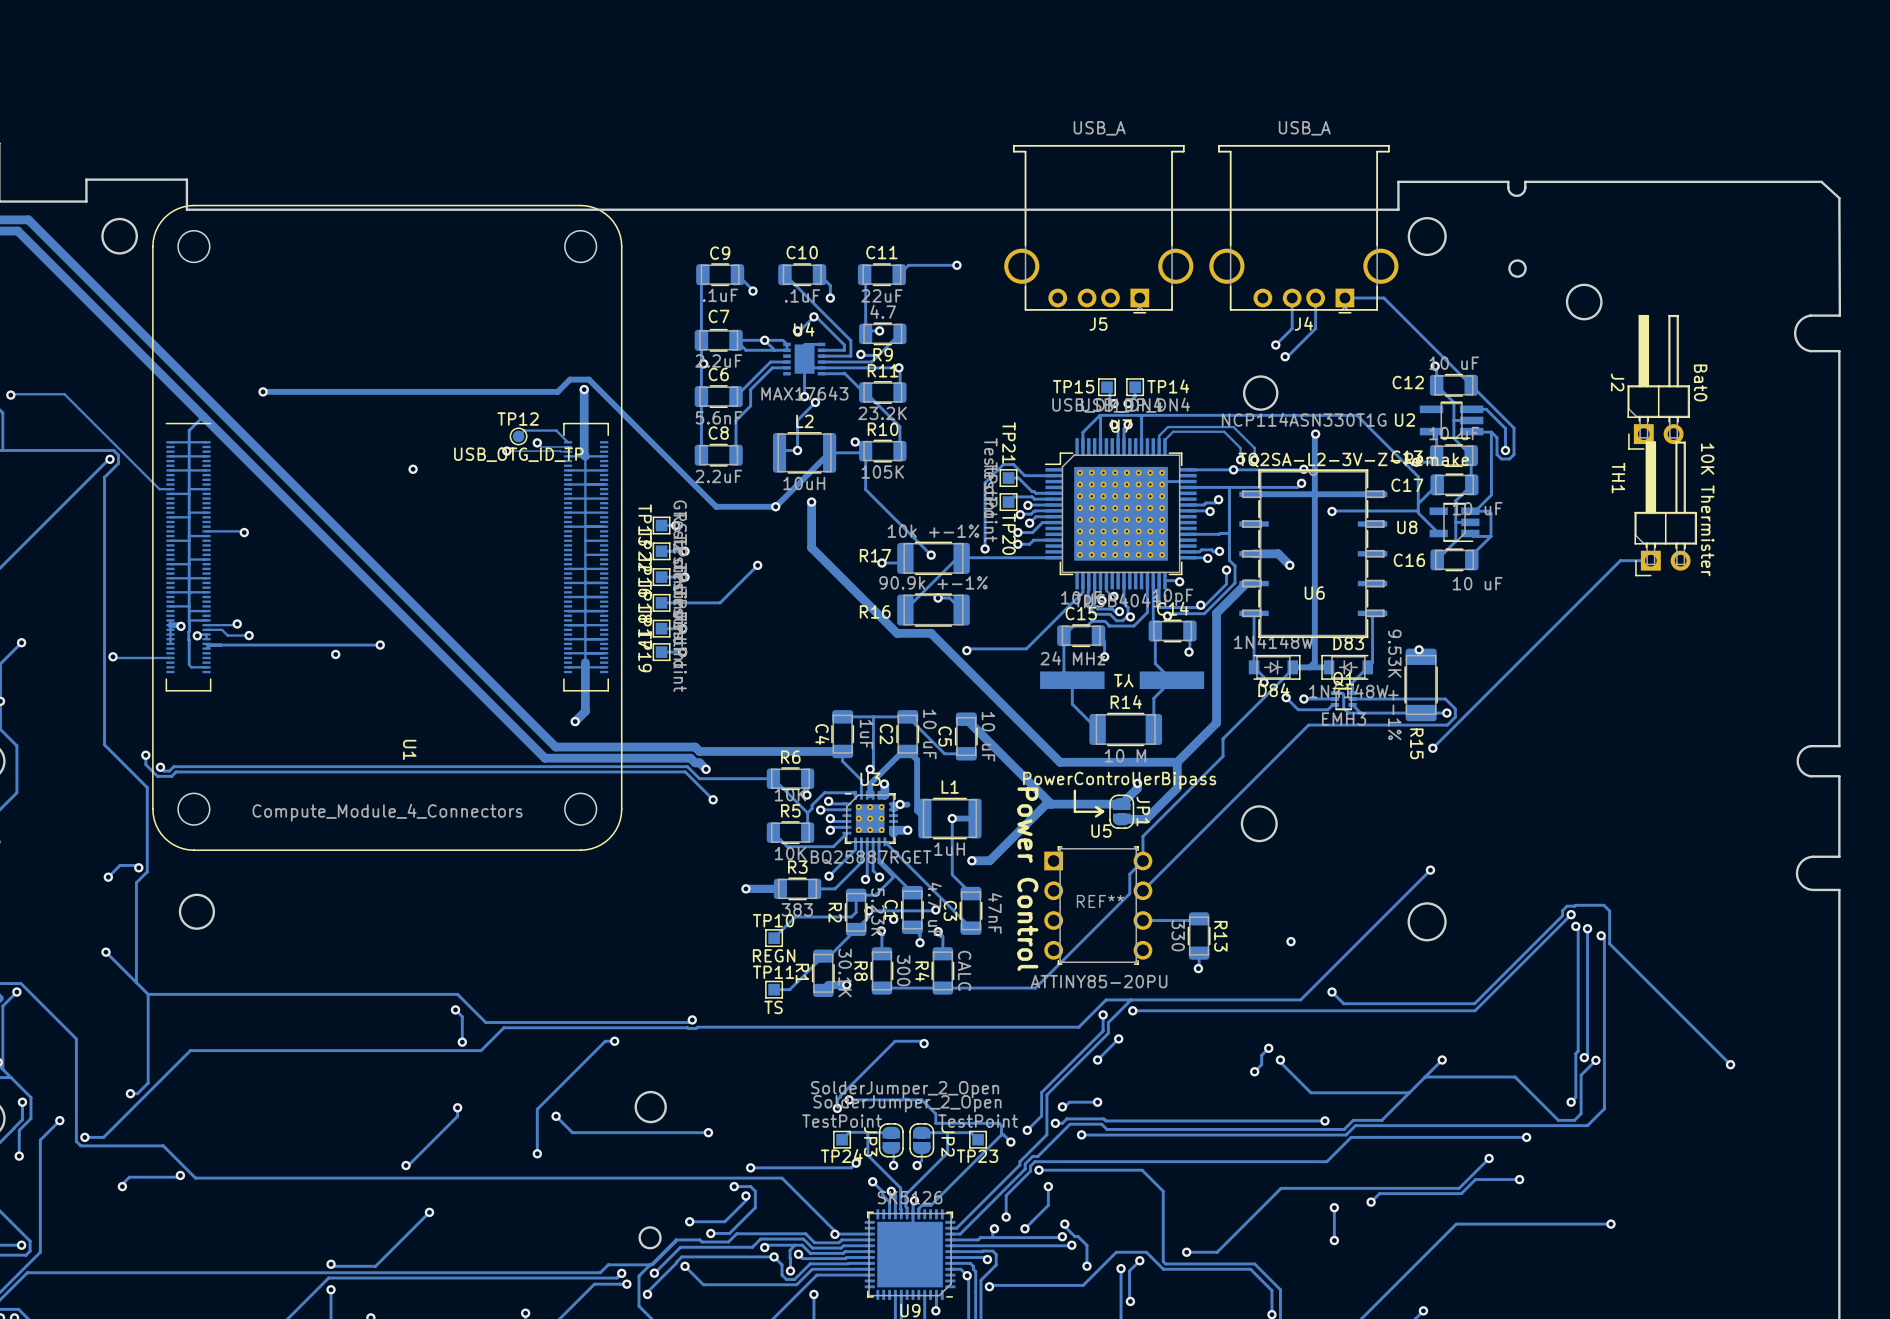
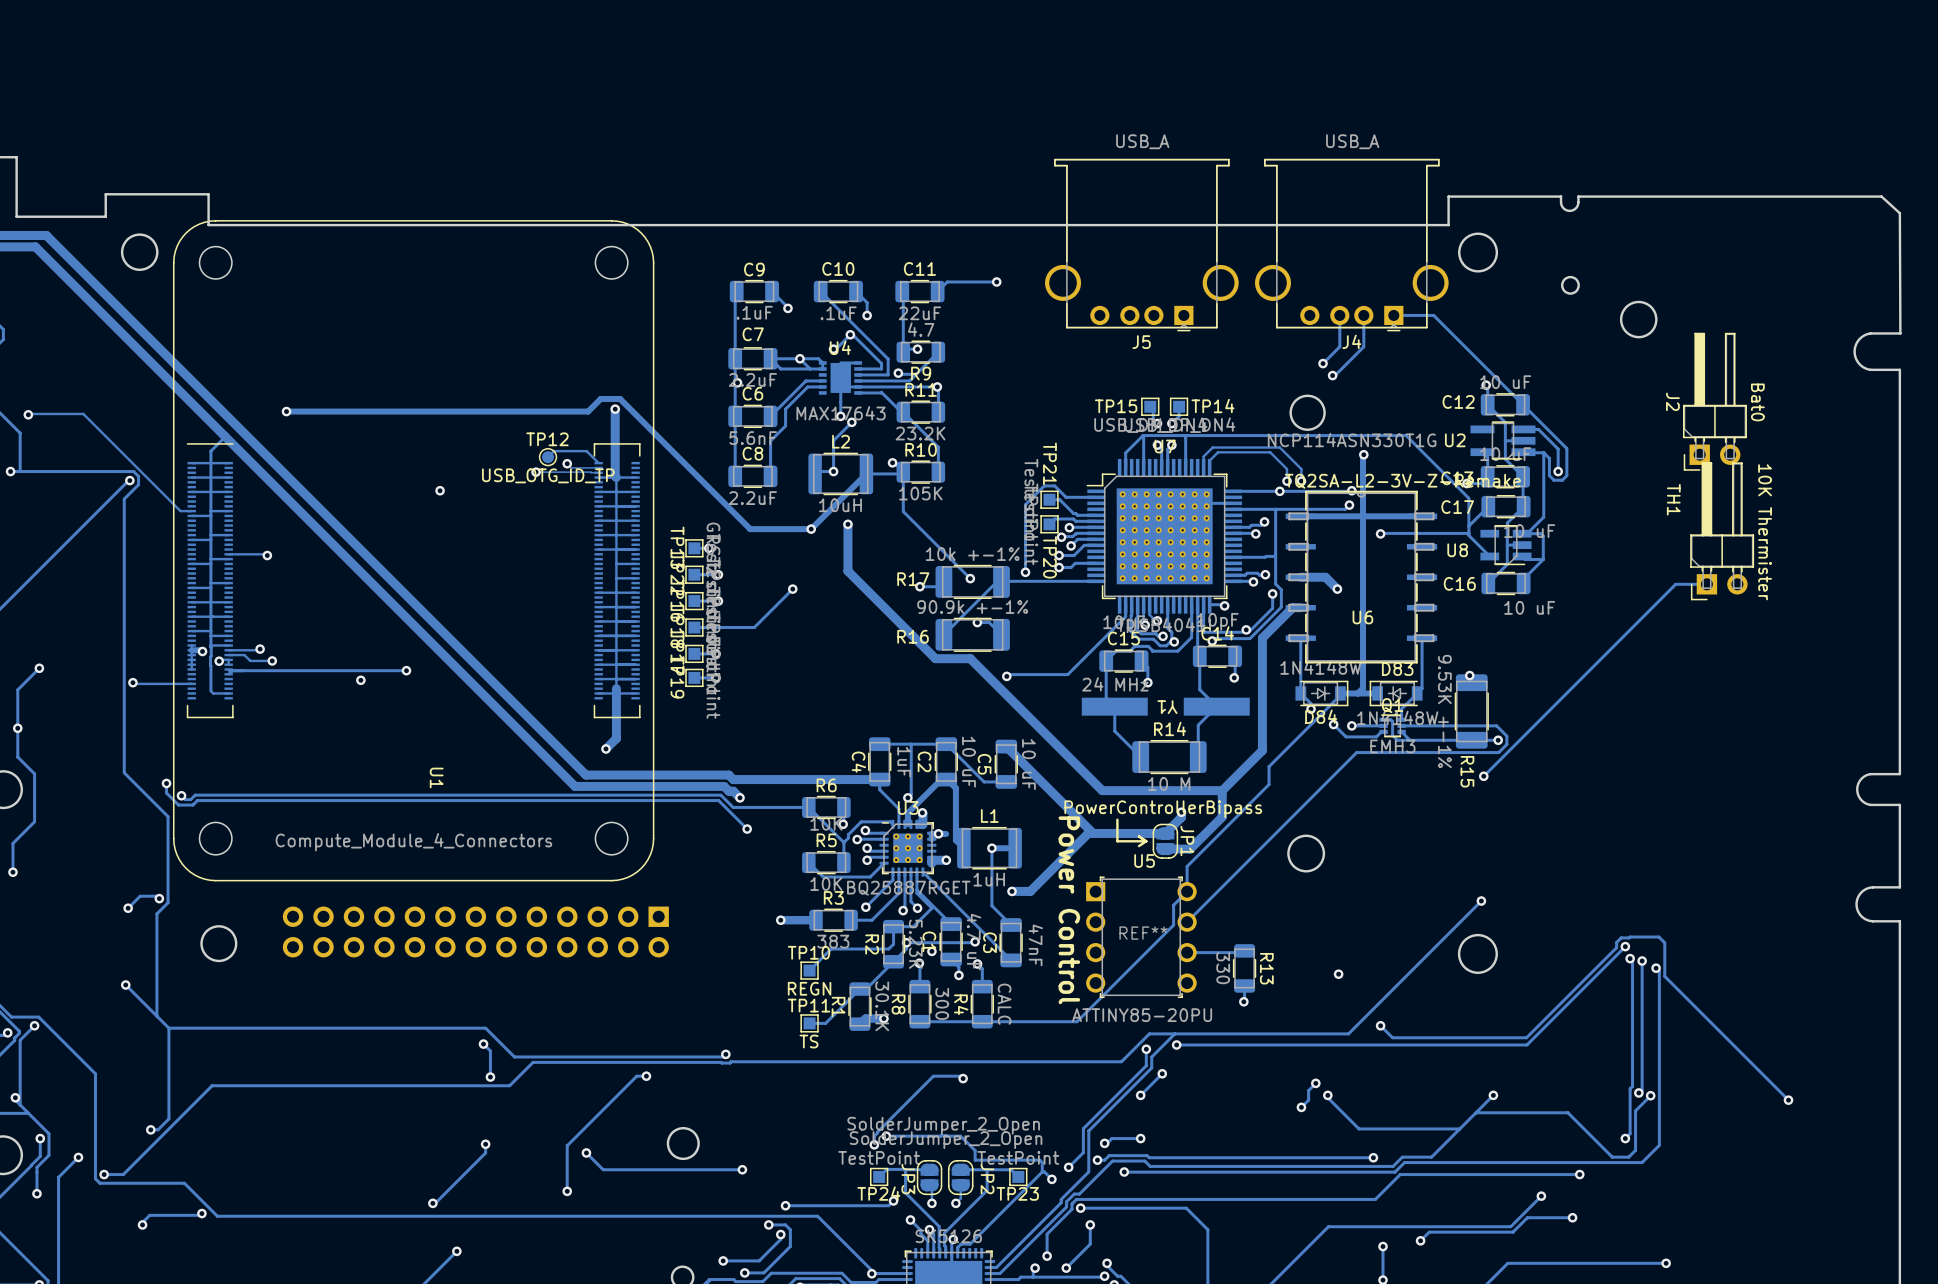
part: none -> (475, 931)

